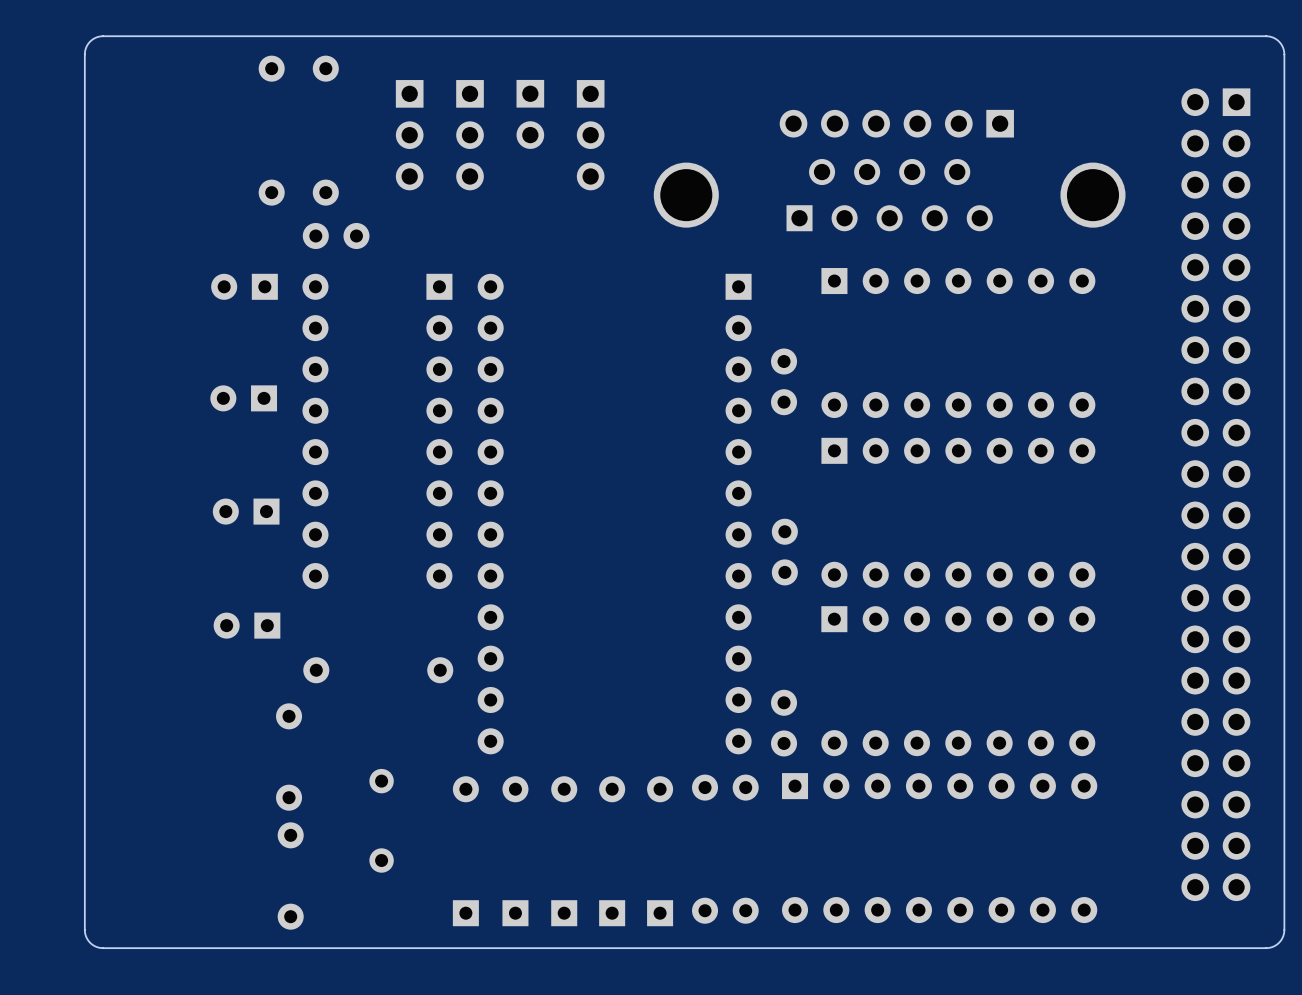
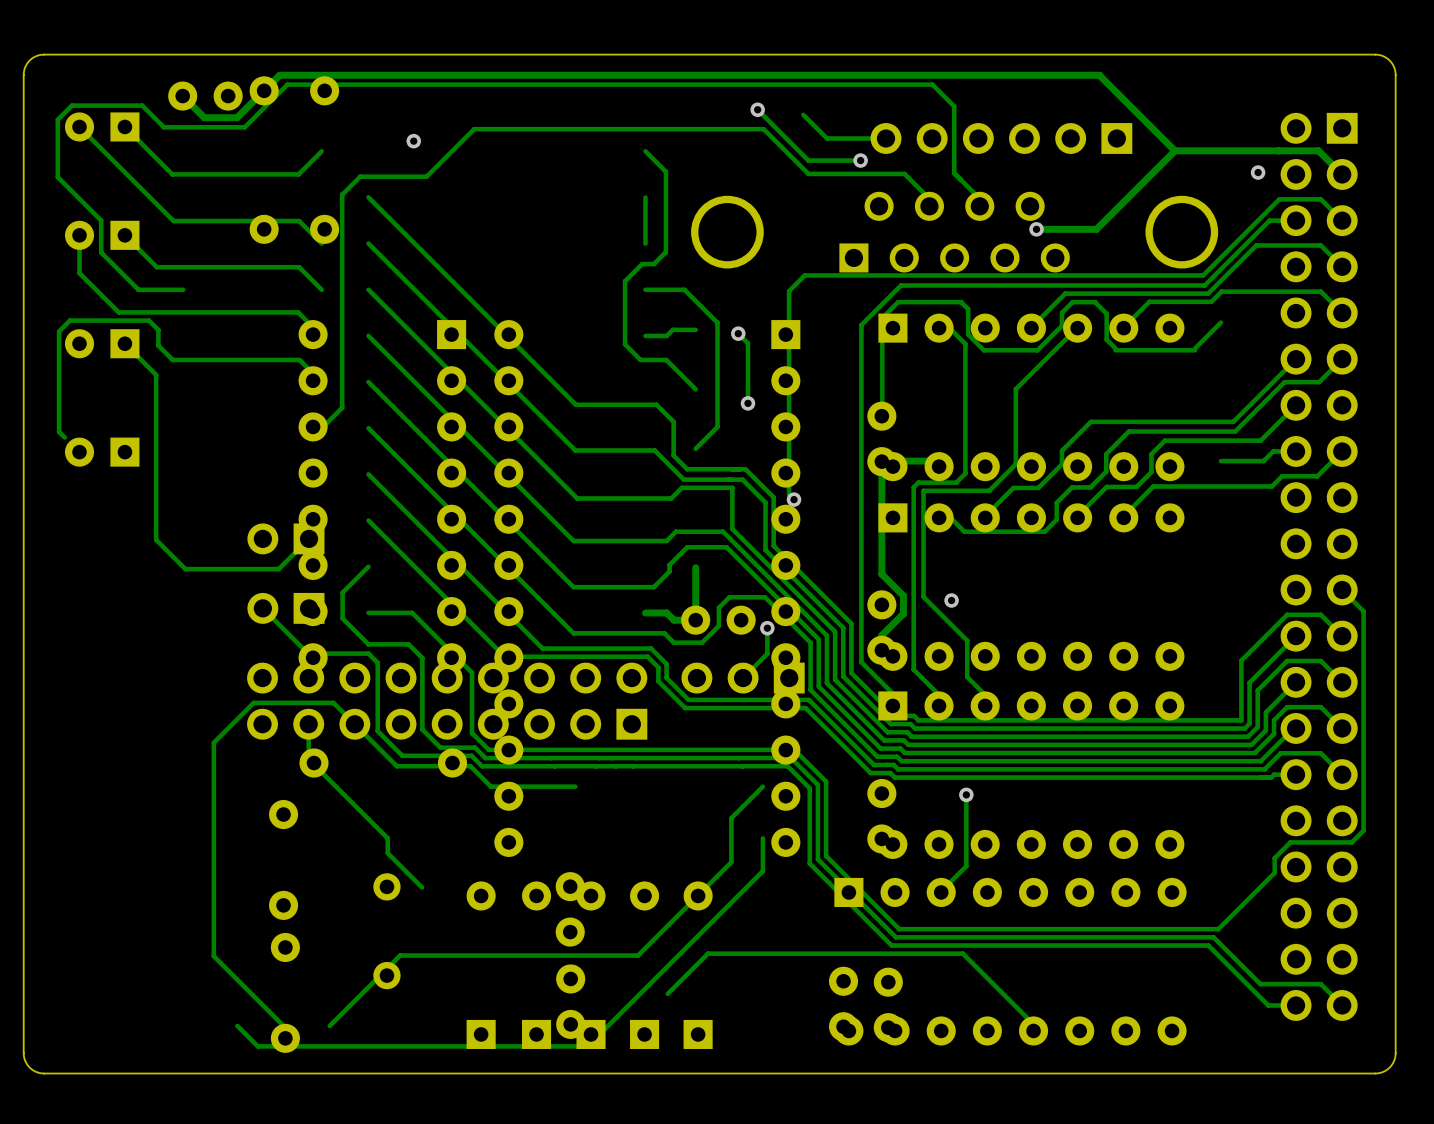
board edge: (103, 36) (90, 41) (84, 54) (84, 929) (90, 942) (103, 948) -> (75, 54) (37, 55) (26, 64) (23, 74) (23, 1053) (26, 1063) (37, 1072) (75, 1073)
track: none -> (273, 81) (279, 75) (1099, 75) (1175, 150)
track: none -> (273, 81) (237, 117) (204, 117) (182, 96)
track: none -> (757, 109) (808, 160) (860, 160)
via: none -> (757, 109)
track: none -> (803, 114) (827, 138) (886, 138)
track: none -> (79, 126) (173, 221) (299, 221) (321, 243)
part: none -> (102, 126)
track: none -> (124, 126) (172, 174) (298, 174) (321, 151)
via: none -> (413, 141)
part: (530, 114) -> none
track: none -> (645, 151) (665, 171) (665, 252) (653, 264) (642, 264) (625, 281) (625, 344) (640, 359) (666, 359) (695, 389)
track: none -> (1175, 150) (1096, 229) (1036, 229)
track: none -> (1175, 150) (1318, 150) (1342, 174)
part position: (896, 123) -> (1001, 138)
via: none -> (860, 160)
part: (409, 135) -> none
part: (470, 135) -> none
part: (590, 135) -> none
via: none -> (1258, 172)
track: none -> (368, 197) (575, 404) (656, 404) (673, 421) (673, 455) (687, 469) (745, 469) (773, 497) (773, 545) (851, 623) (851, 673) (894, 715) (914, 715) (918, 720) (1241, 720) (1241, 660) (1287, 614) (1320, 614) (1342, 636)
track: none -> (645, 197) (645, 243)
track: none -> (934, 203) (904, 173) (808, 173) (763, 129) (474, 129) (426, 176) (360, 176) (342, 194) (342, 407) (321, 428)
track: none -> (984, 203) (954, 173) (954, 106) (932, 84) (287, 84) (244, 127) (163, 127) (142, 105) (71, 105) (57, 119) (57, 177) (101, 220) (101, 252) (138, 289) (183, 289)
track: none -> (1296, 220) (1269, 220) (1204, 285) (900, 285) (861, 325) (861, 662) (898, 698)
track: none -> (1342, 220) (1320, 199) (1279, 199) (1203, 275) (804, 275) (789, 291) (789, 494) (794, 499)
via: none -> (1036, 229)
track: none -> (79, 235) (79, 273) (118, 312) (298, 312) (321, 335)
part: none -> (102, 235)
track: none -> (124, 235) (156, 267) (299, 267) (321, 289)
track: none -> (368, 243) (575, 450) (654, 450) (683, 479) (742, 479) (765, 502) (765, 550) (843, 627) (843, 676) (890, 724) (910, 724) (915, 728) (1244, 728) (1249, 723) (1249, 682) (1296, 636)
track: none -> (1342, 266) (1320, 245) (1256, 245) (1208, 293) (1065, 293) (1036, 322)
part position: (336, 235) -> (205, 96)
track: none -> (368, 289) (577, 498) (671, 498) (682, 487) (732, 487) (732, 529) (835, 631) (835, 679) (887, 732) (907, 732) (911, 736) (1248, 736) (1257, 727) (1257, 690) (1287, 660) (1320, 660) (1342, 682)
track: none -> (645, 289) (684, 289) (717, 322) (717, 426) (695, 448)
track: none -> (1342, 312) (1320, 291) (1221, 291) (1211, 301) (1149, 301) (1128, 322)
track: none -> (943, 322) (965, 344) (965, 473) (956, 482) (918, 482) (913, 487) (913, 669) (943, 699)
track: none -> (1082, 322) (1015, 389) (1015, 464) (989, 490) (923, 490) (923, 596) (967, 640) (967, 677) (990, 699)
track: none -> (1220, 322) (1195, 348)
track: none -> (695, 329) (672, 329) (666, 335) (645, 335)
track: none -> (738, 333) (747, 343) (747, 403)
via: none -> (738, 333)
part: (244, 286) -> none
track: none -> (368, 335) (573, 540) (666, 540) (675, 531) (723, 531) (826, 635) (826, 683) (884, 740) (903, 740) (908, 744) (1251, 744) (1265, 730) (1265, 712) (1296, 682)
part: none -> (102, 343)
track: none -> (124, 343) (156, 374) (156, 539) (185, 569) (278, 569) (309, 538)
track: none -> (1115, 348) (1106, 339) (1106, 313) (1095, 302) (1072, 302) (1062, 312) (1062, 325) (1037, 350) (983, 350) (968, 334) (968, 309) (961, 302) (898, 302) (882, 317) (882, 410)
track: none -> (1195, 350) (1115, 350)
track: none -> (1296, 359) (1233, 421) (1090, 421) (1062, 450) (1062, 464) (1038, 487) (1013, 487) (990, 511)
track: none -> (1342, 359) (1319, 382) (1284, 382) (1235, 431) (1128, 431) (1106, 454) (1106, 471) (1090, 487) (1072, 487) (1056, 502) (1056, 519) (1044, 531) (964, 531) (943, 511)
track: none -> (321, 382) (299, 359) (172, 359) (158, 345) (158, 329) (149, 320) (69, 320) (59, 331) (59, 431) (64, 437)
track: none -> (368, 382) (573, 587) (653, 587) (669, 571) (669, 565) (687, 547) (726, 547) (818, 639) (818, 686) (880, 748) (900, 748) (904, 753) (1254, 753) (1274, 733) (1274, 720) (1287, 707) (1320, 707) (1342, 728)
via: none -> (747, 403)
track: none -> (1296, 405) (1260, 440)
track: none -> (368, 428) (573, 633) (664, 633) (673, 642) (702, 642) (718, 625) (718, 607) (729, 597) (765, 597) (810, 642) (810, 689) (877, 756) (897, 756) (901, 761) (1260, 761) (1293, 728) (1296, 728)
part position: (784, 381) -> (881, 438)
track: none -> (1260, 440) (1164, 440) (1151, 454) (1151, 472) (1136, 486) (1106, 486) (1082, 511)
track: none -> (1296, 451) (1273, 451) (1263, 461) (1220, 461)
track: none -> (1342, 451) (1317, 476) (1282, 476) (1271, 486) (1153, 486) (1128, 511)
part: none -> (102, 452)
part: (243, 398) -> none
track: none -> (943, 461) (881, 461) (881, 574) (903, 595) (903, 613) (881, 635) (881, 650)
track: none -> (368, 474) (542, 648) (651, 648) (666, 664) (666, 677) (688, 699) (808, 699) (873, 764) (893, 764) (898, 769) (1264, 769) (1280, 753) (1320, 753) (1342, 774)
via: none -> (794, 499)
track: none -> (368, 520) (504, 656) (647, 656) (658, 667) (658, 681) (685, 708) (805, 708) (870, 773) (890, 773) (894, 777) (1271, 777) (1274, 774) (1296, 774)
part: none -> (285, 538)
track: none -> (368, 566) (342, 592) (342, 618) (368, 644) (408, 644) (422, 658) (422, 729) (440, 747) (475, 747) (485, 758) (551, 758)
track: none -> (695, 567) (695, 620) (673, 620) (666, 612) (645, 612)
part: (246, 511) -> none
track: none -> (1342, 589) (1363, 611) (1363, 830) (1351, 842) (1290, 842) (1274, 858) (1274, 872) (1218, 929) (899, 929) (826, 855) (826, 781) (794, 749) (488, 749)
via: none -> (951, 600)
track: none -> (262, 608) (308, 653) (368, 653) (377, 662) (377, 731) (402, 755) (471, 755) (482, 766) (554, 766)
part: none -> (285, 608)
track: none -> (368, 612) (412, 612) (472, 672) (472, 733) (488, 749)
part: none -> (718, 620)
track: none -> (767, 628) (767, 653) (743, 678)
via: none -> (767, 628)
part position: (784, 552) -> (881, 627)
part: none -> (743, 678)
part: none -> (447, 701)
part: (246, 625) -> none
track: none -> (308, 724) (308, 759) (387, 838) (387, 853) (422, 887)
track: none -> (599, 758) (551, 758)
track: none -> (612, 758) (599, 758)
track: none -> (636, 758) (612, 758)
track: none -> (739, 758) (791, 758) (817, 784) (817, 859) (895, 937) (1213, 937) (1260, 984) (1320, 984) (1342, 1005)
track: none -> (739, 758) (636, 758)
track: none -> (595, 766) (554, 766)
track: none -> (615, 766) (595, 766)
track: none -> (632, 766) (615, 766)
track: none -> (742, 766) (787, 766) (809, 788) (809, 863) (891, 945) (1208, 945) (1268, 1005) (1296, 1005)
track: none -> (742, 766) (632, 766)
track: none -> (575, 786) (490, 786) (470, 766) (396, 766) (333, 702) (253, 702) (213, 742) (213, 956) (283, 1025)
track: none -> (762, 786) (731, 818) (731, 862) (638, 955) (400, 955) (329, 1025)
track: none -> (966, 794) (966, 866) (943, 888)
via: none -> (966, 794)
part position: (784, 723) -> (881, 816)
track: none -> (762, 838) (762, 871) (587, 1046) (257, 1046) (237, 1025)
part: (725, 787) -> none
part: none -> (570, 909)
track: none -> (667, 993) (707, 953) (962, 953) (1036, 1027)
part: none -> (570, 1001)
part: none -> (843, 1003)
part: none -> (888, 1004)
part: (725, 910) -> none

